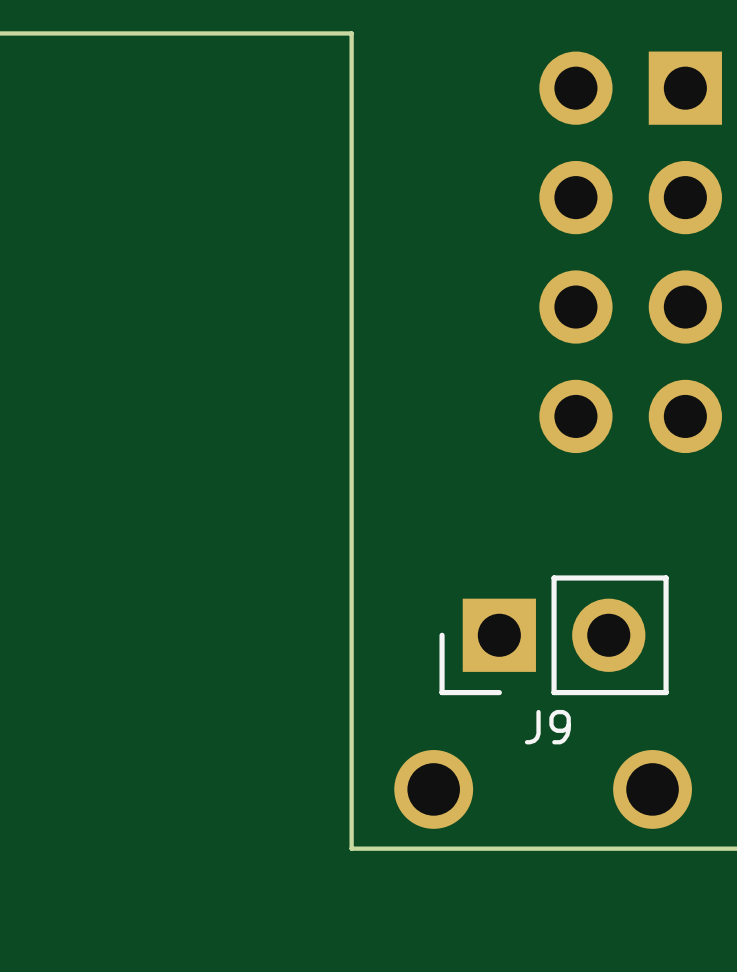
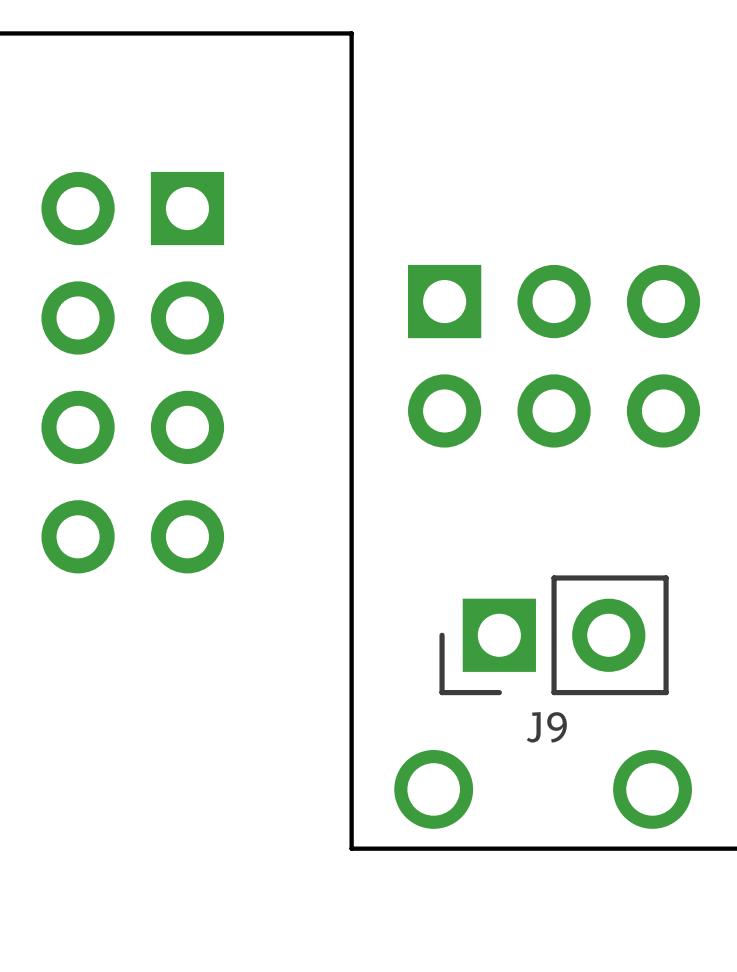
part position: (630, 252) -> (132, 372)
part: none -> (554, 356)

